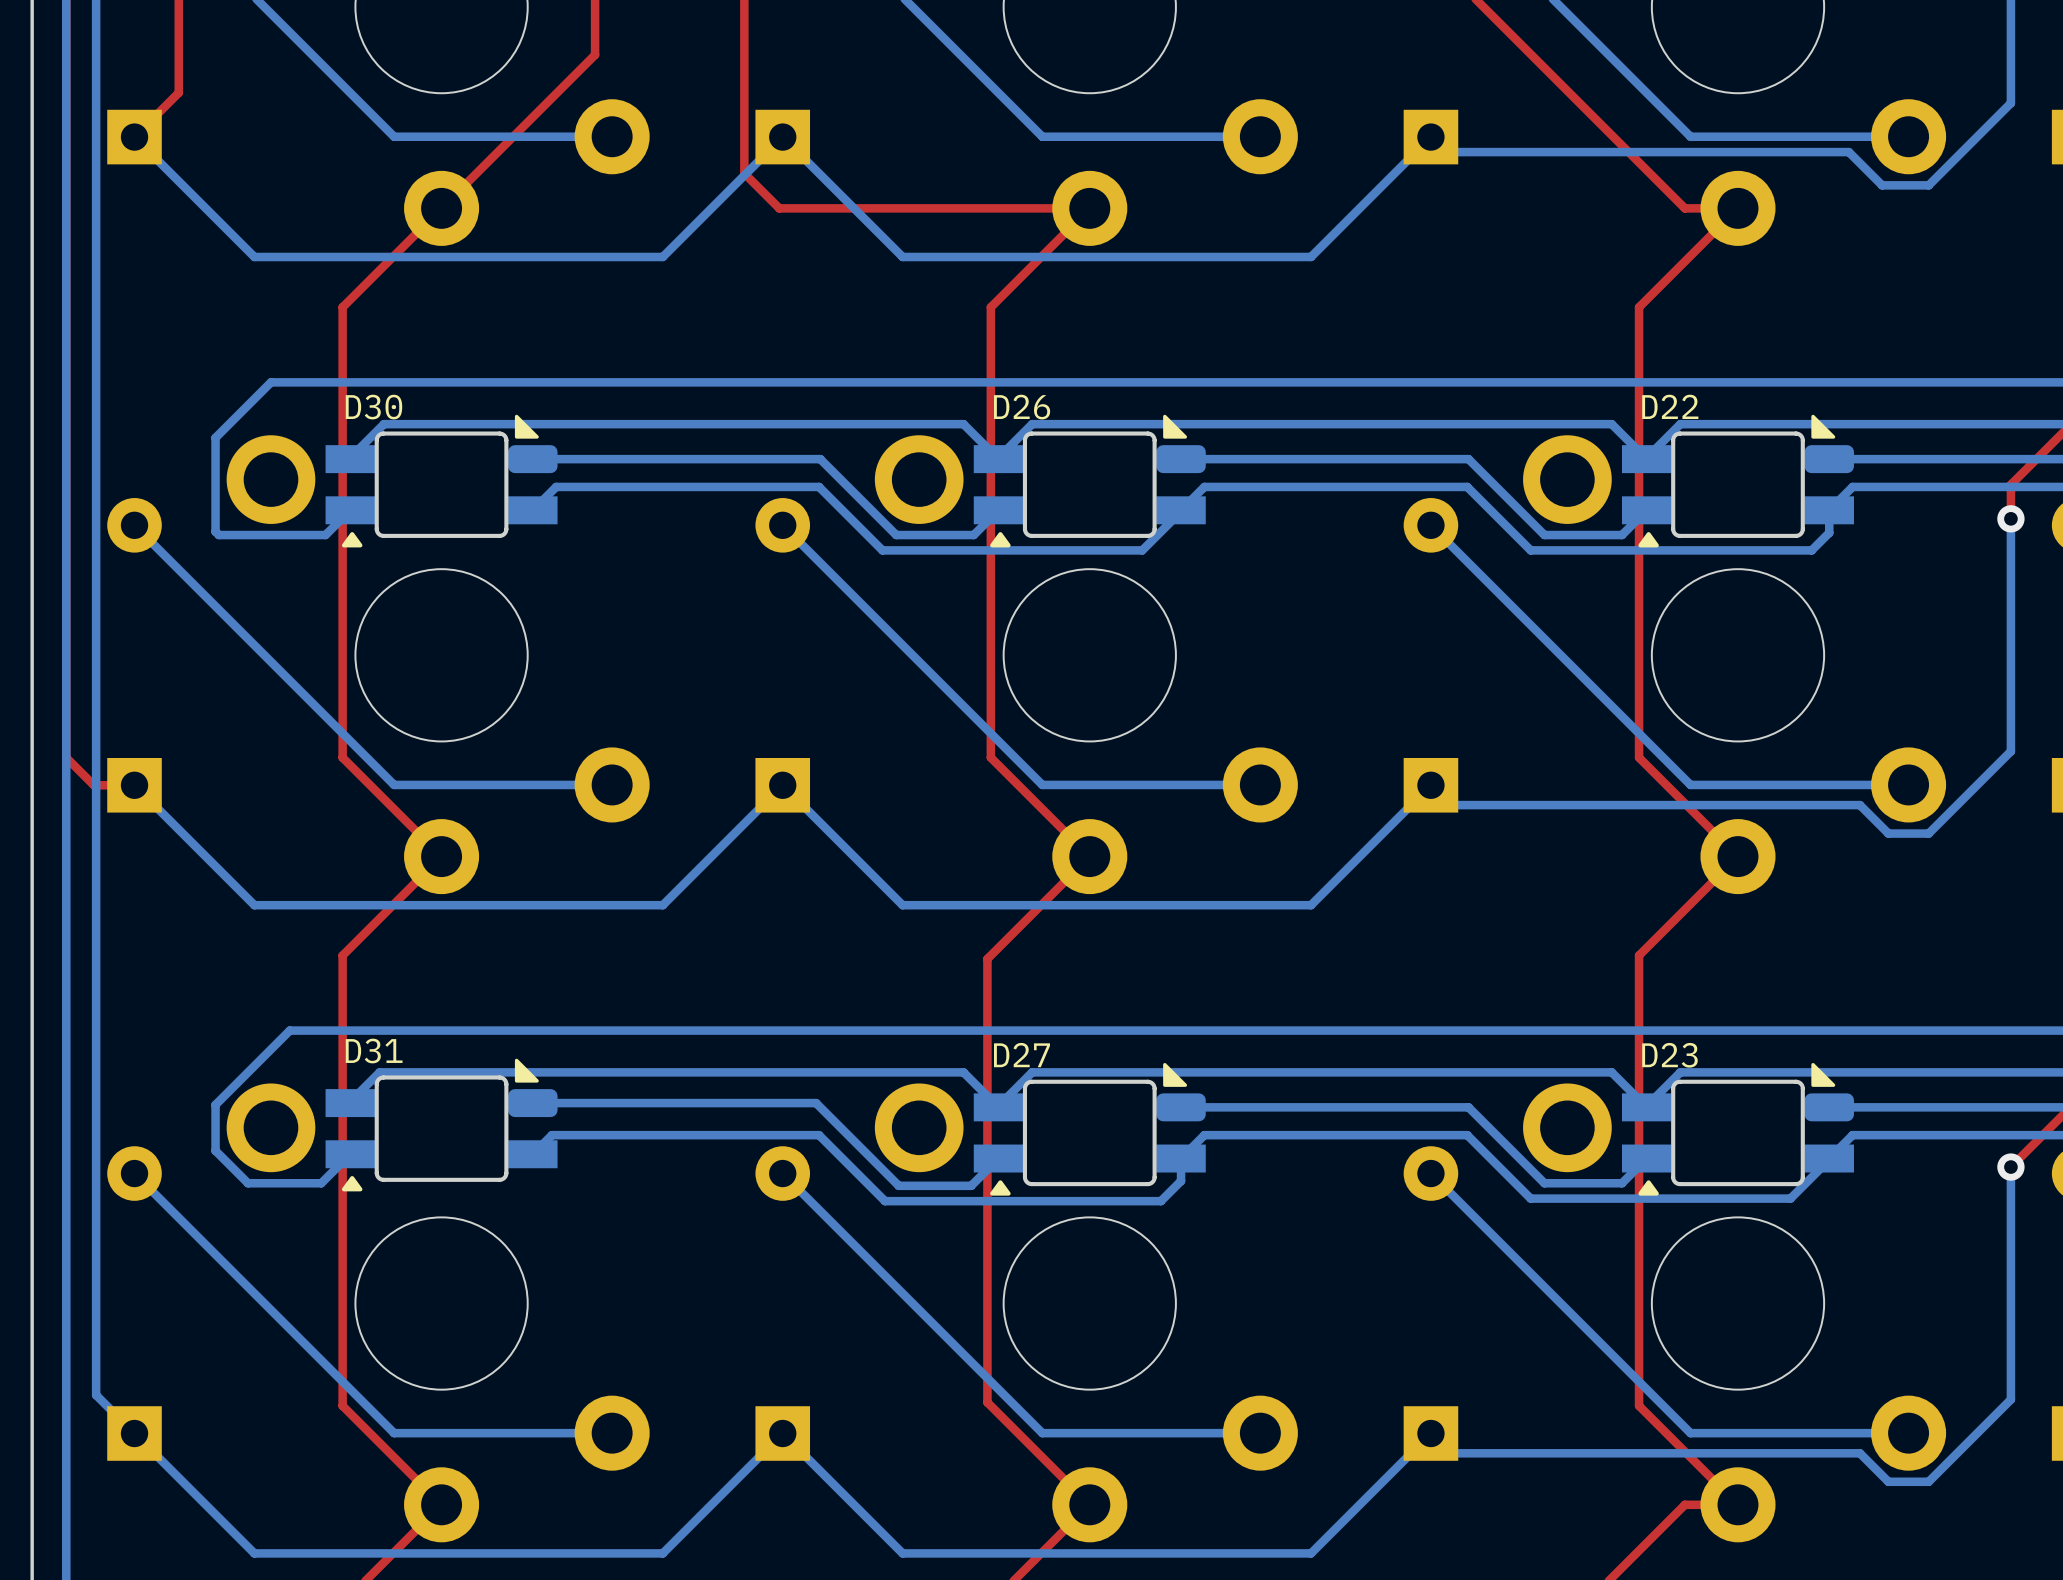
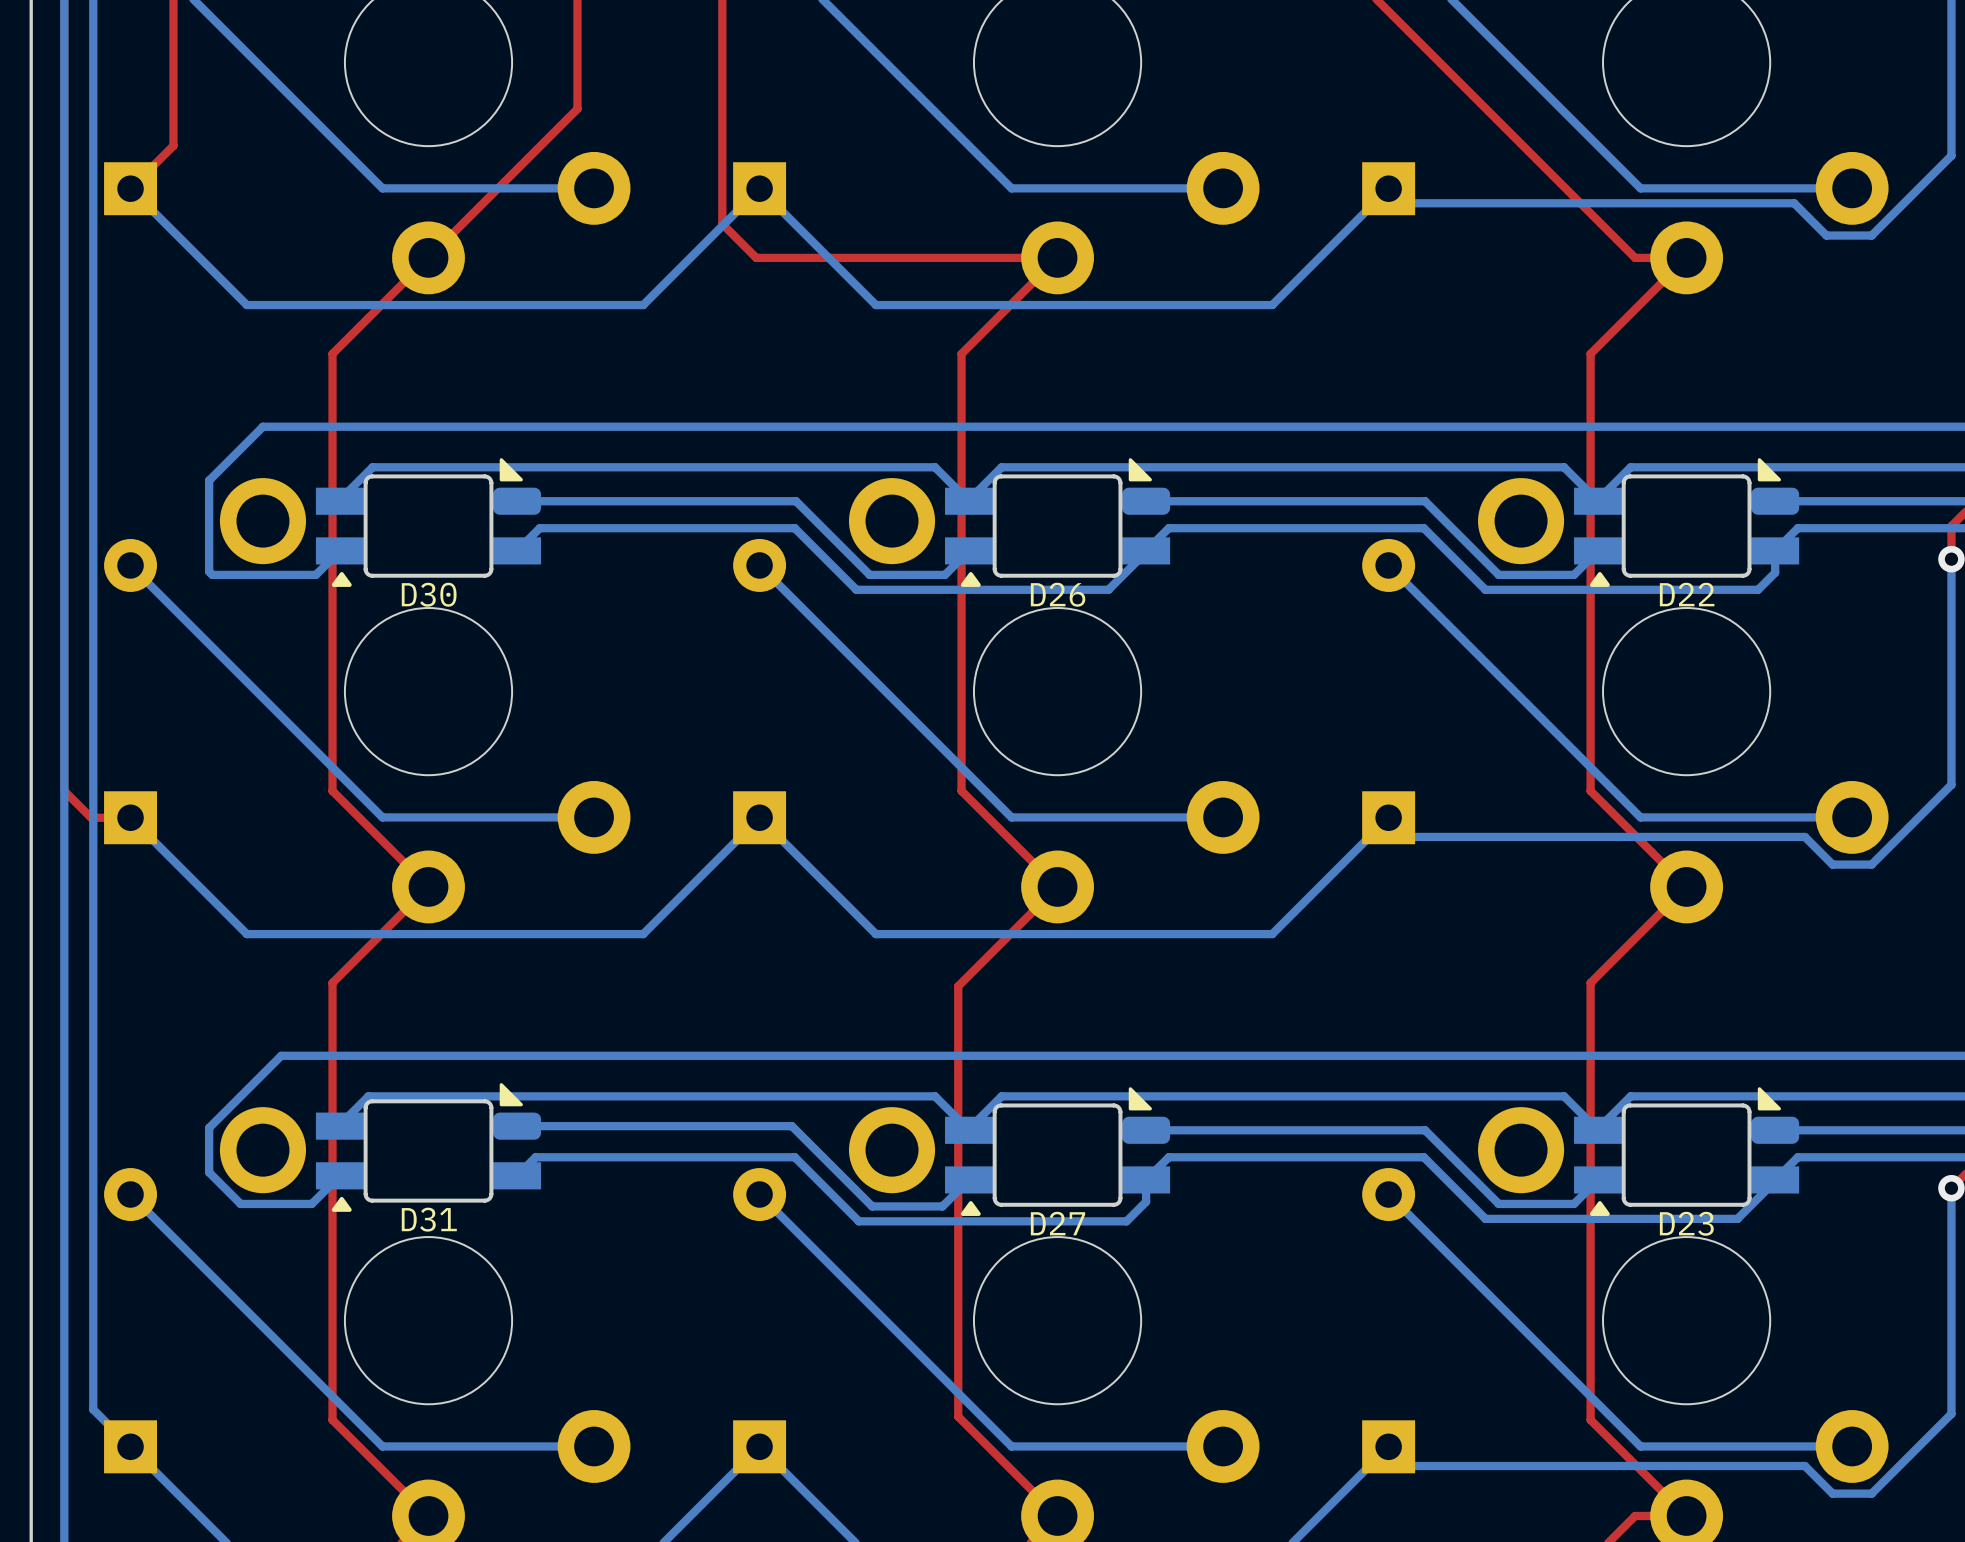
D22 name position: D22 (1670, 406) -> D22 (1687, 594)
D30 name position: D30 (374, 407) -> D30 (429, 594)
D26 name position: D26 (1022, 407) -> D26 (1058, 594)
D31 name position: D31 (374, 1051) -> D31 (429, 1219)
D27 name position: D27 (1021, 1055) -> D27 (1057, 1223)
D23 name position: D23 (1669, 1055) -> D23 (1686, 1223)

